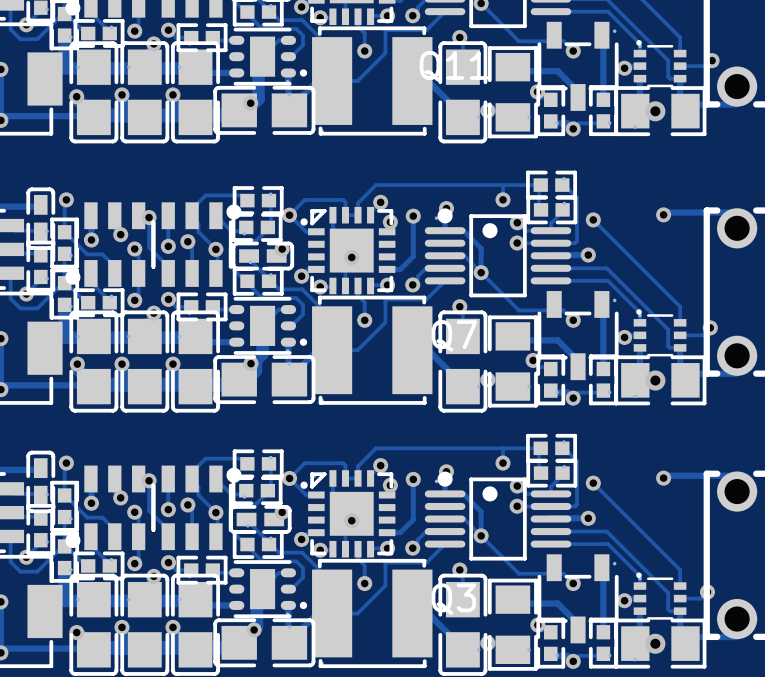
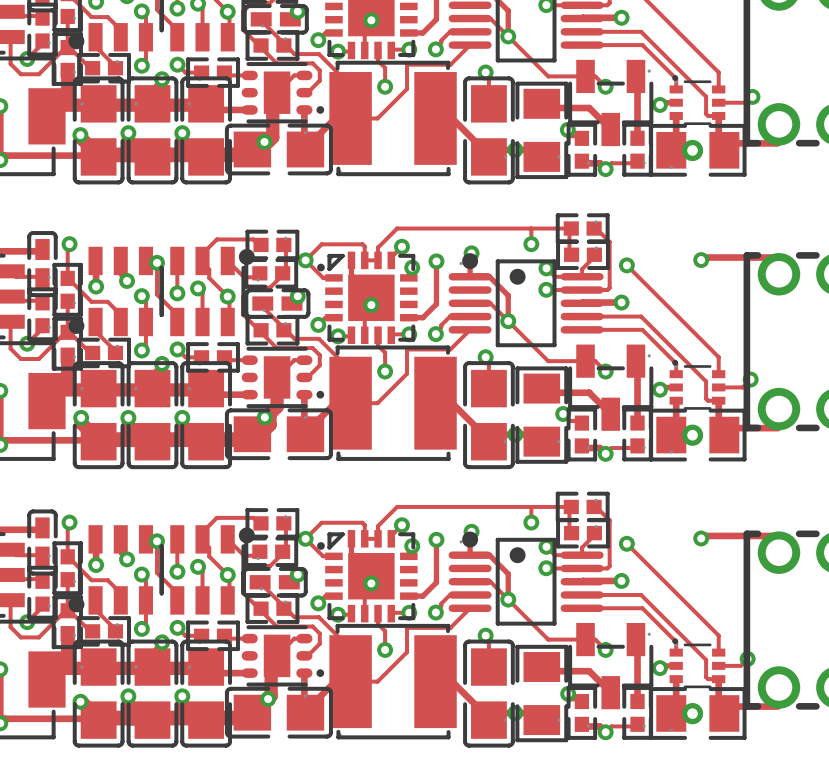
part: (578, 66) -> none
part: none -> (610, 102)
part: (578, 335) -> none
part: none -> (610, 387)
part: (578, 598) -> none
part: none -> (610, 666)

